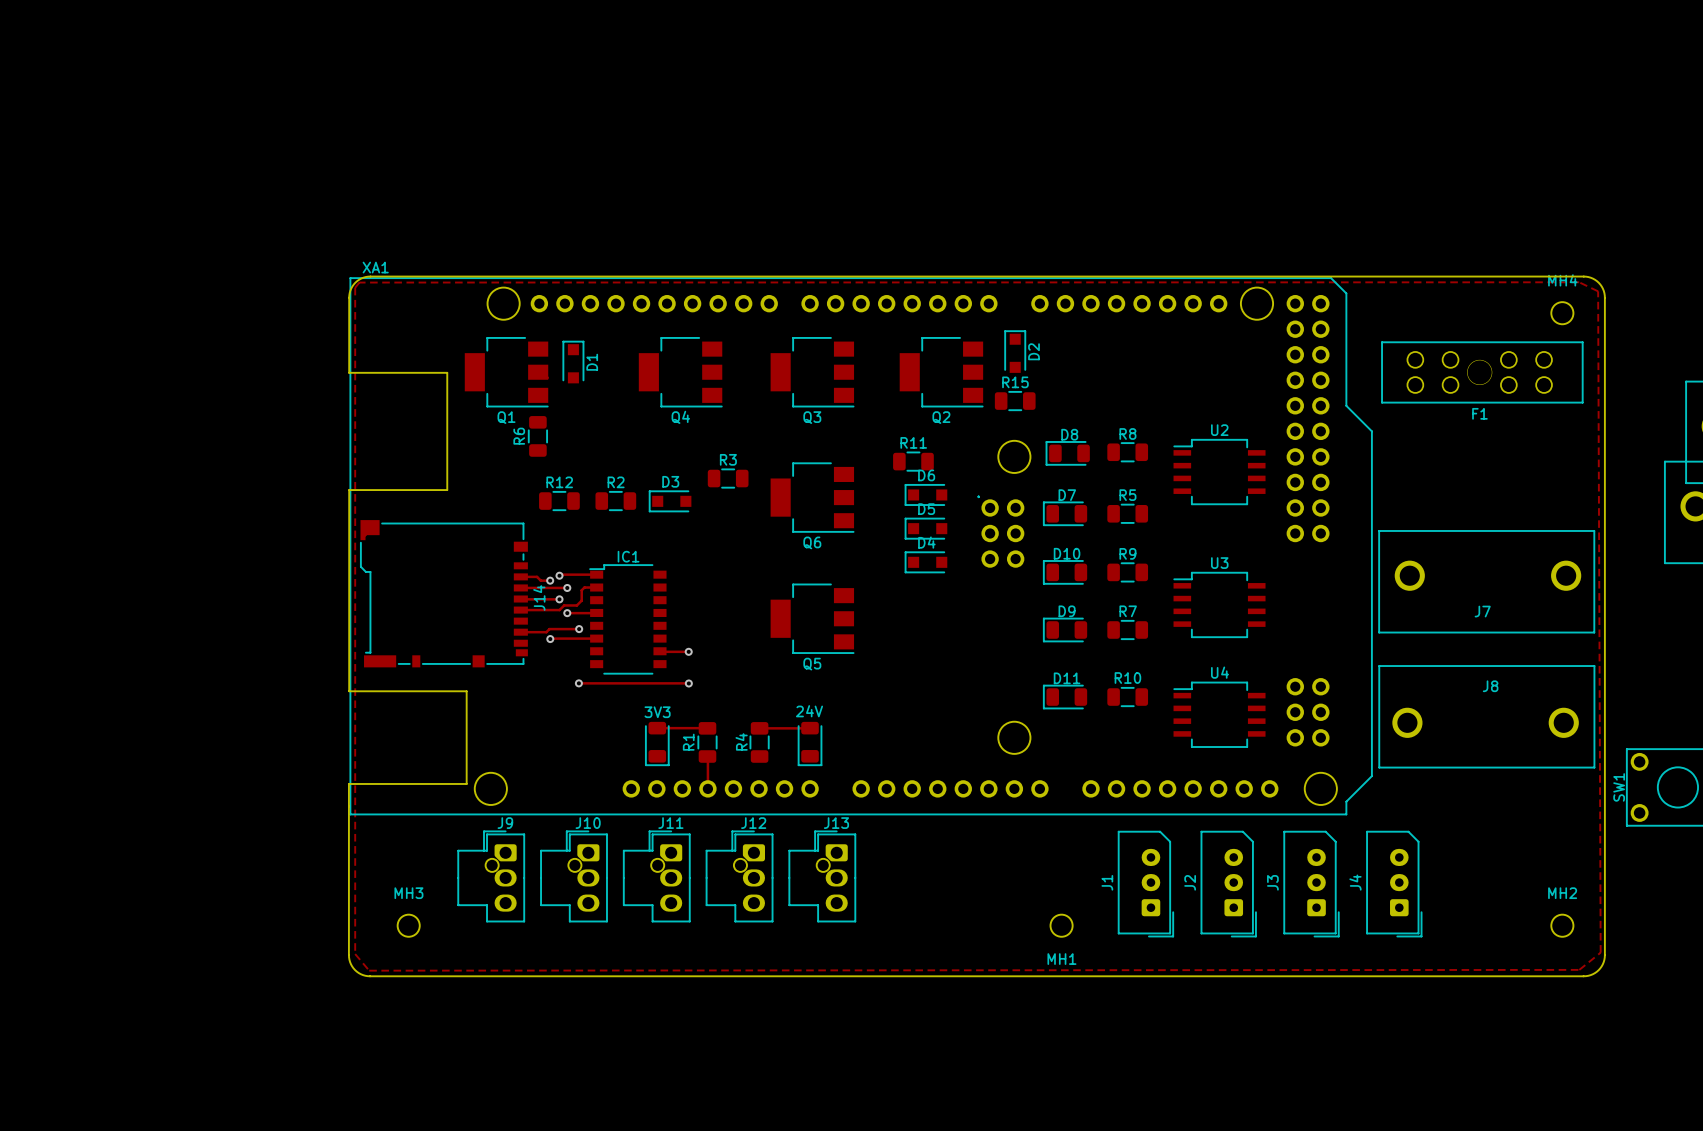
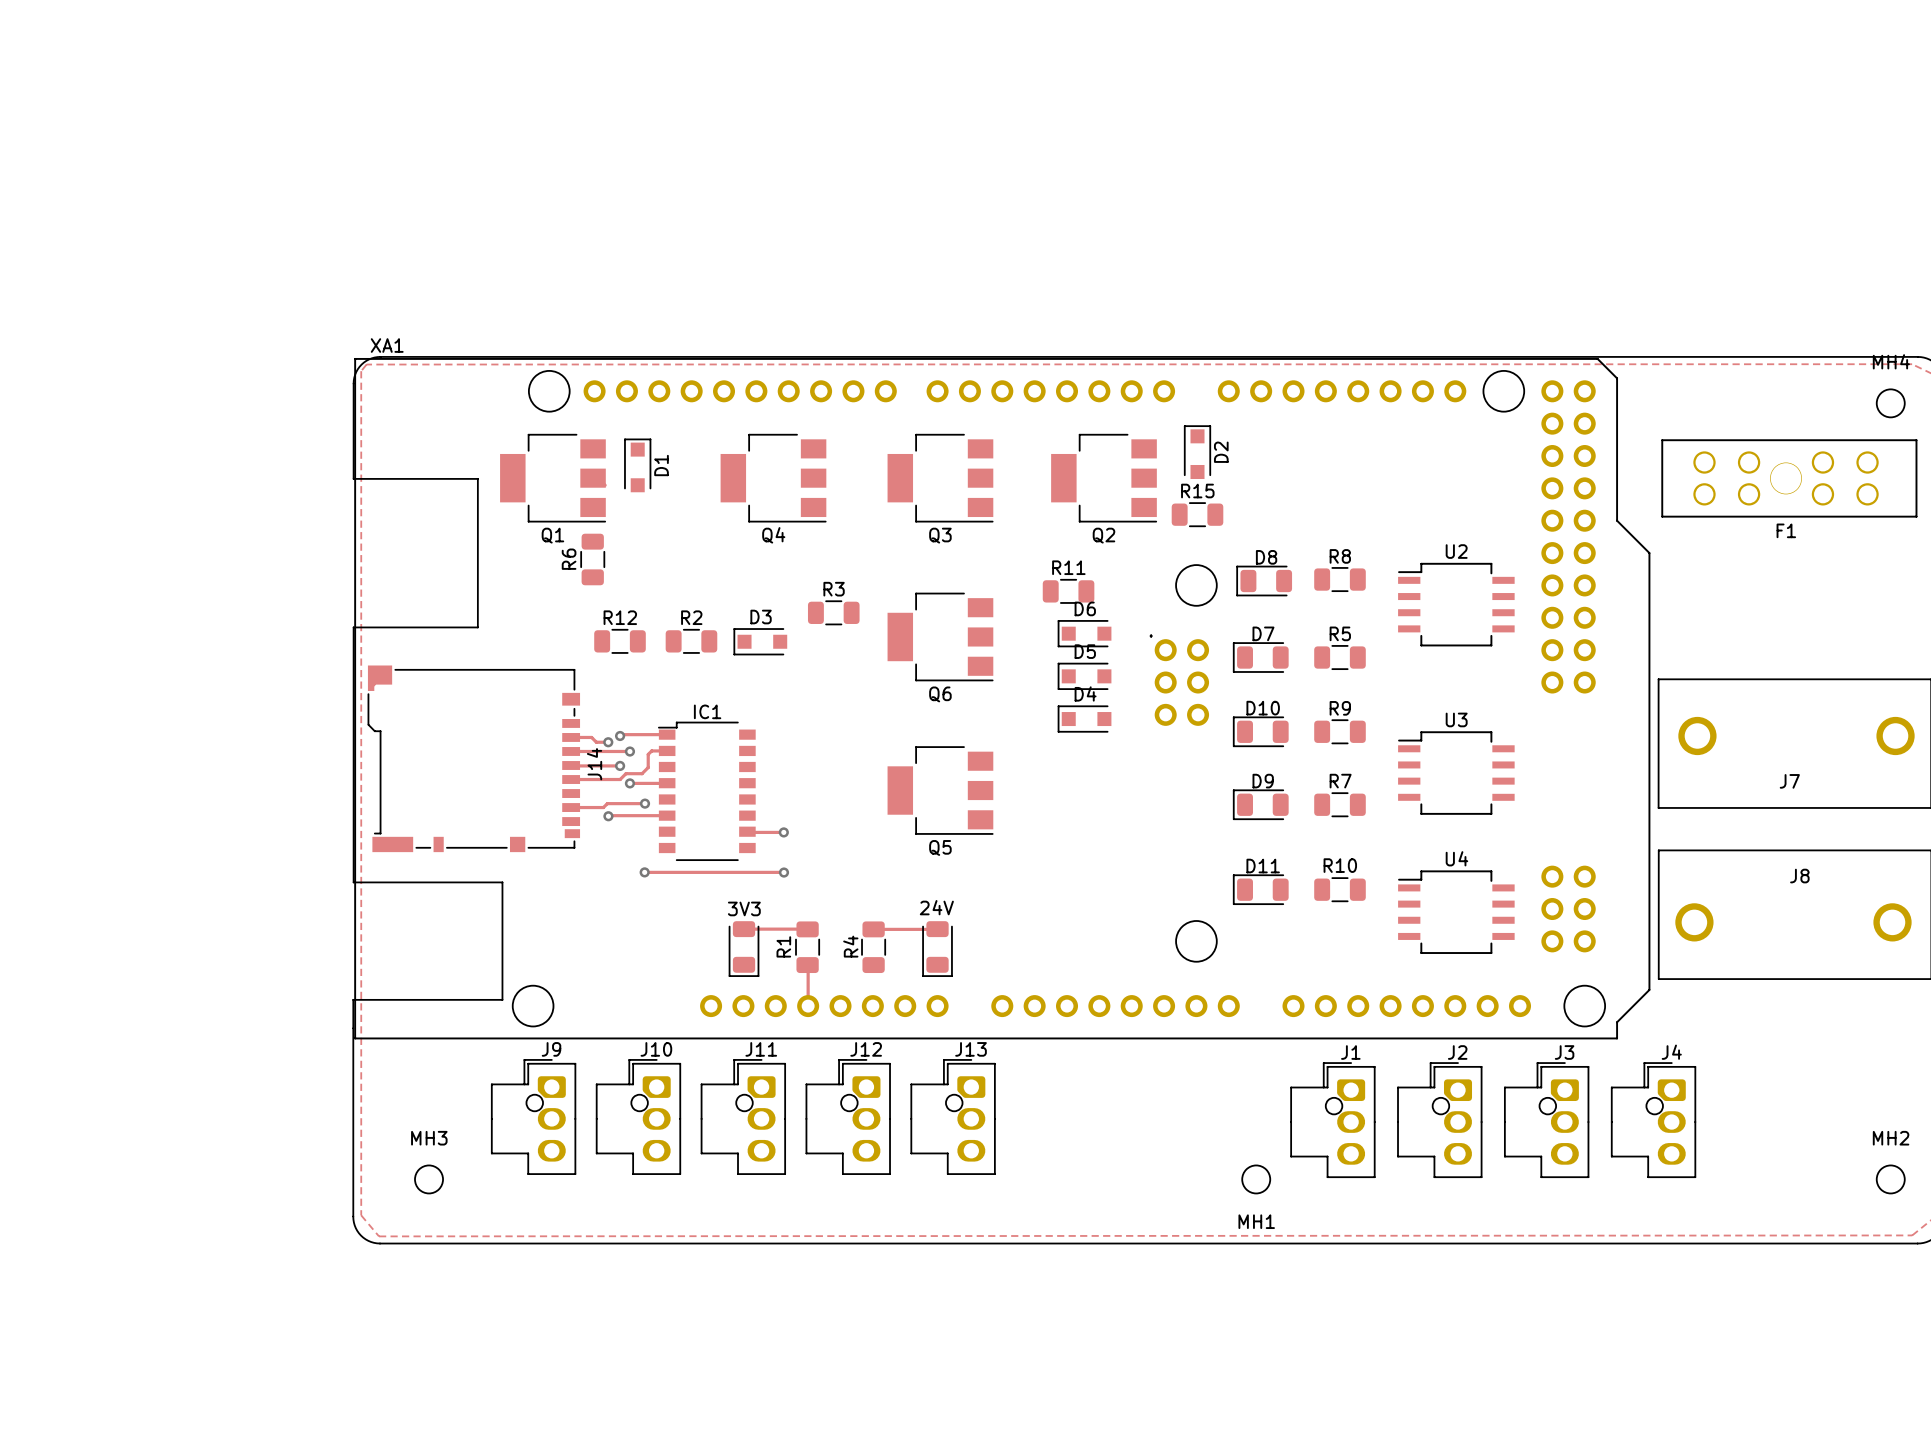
J1 footprint: [1118, 831, 1174, 938] -> [1290, 1062, 1376, 1178]
J2 footprint: [1200, 831, 1257, 938] -> [1397, 1062, 1483, 1178]
J3 footprint: [1283, 831, 1340, 938] -> [1504, 1062, 1590, 1178]
J4 footprint: [1366, 831, 1423, 938] -> [1611, 1062, 1697, 1178]
J1 name position: J1 (1107, 882) -> J1 (1350, 1052)
J2 name position: J2 (1190, 882) -> J2 (1457, 1052)
J3 name position: J3 (1272, 882) -> J3 (1564, 1052)
J4 name position: J4 (1355, 882) -> J4 (1671, 1052)

